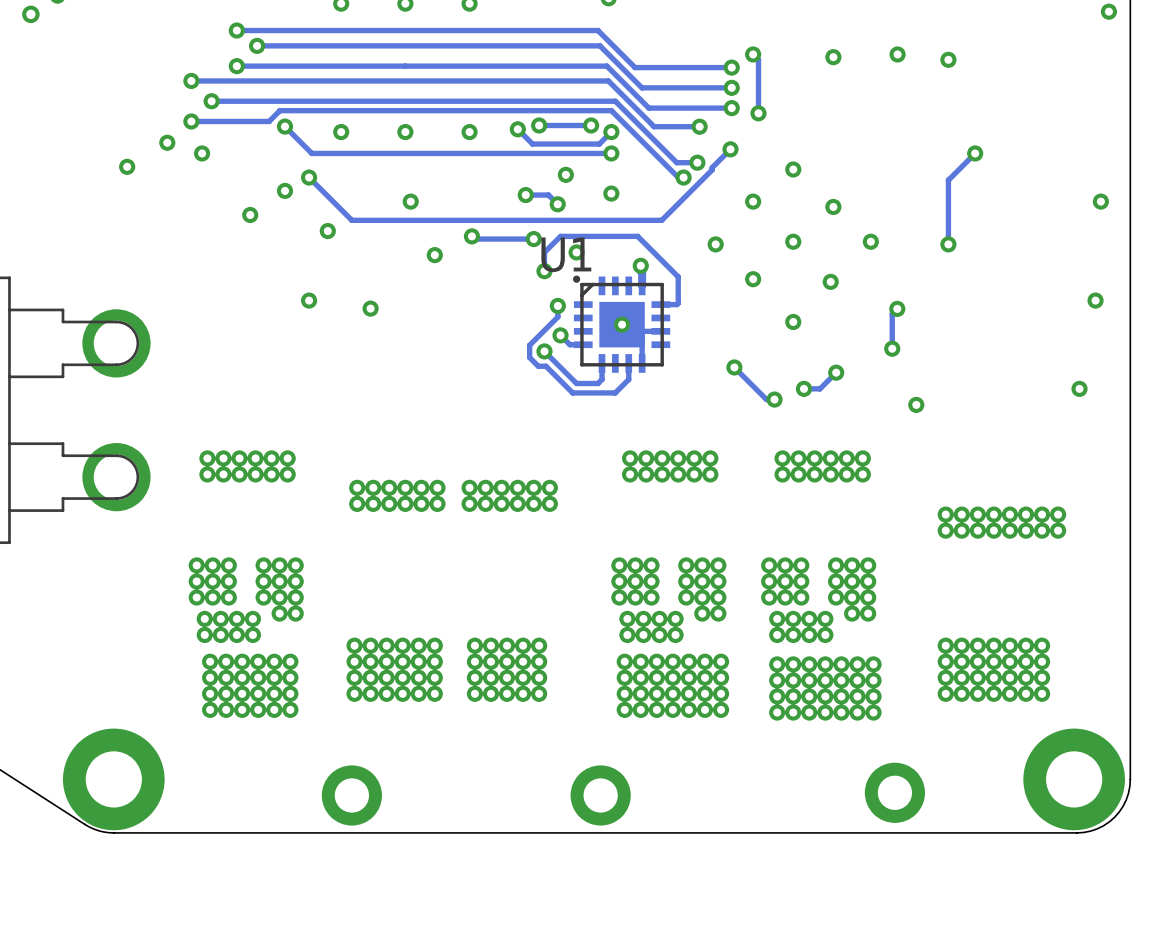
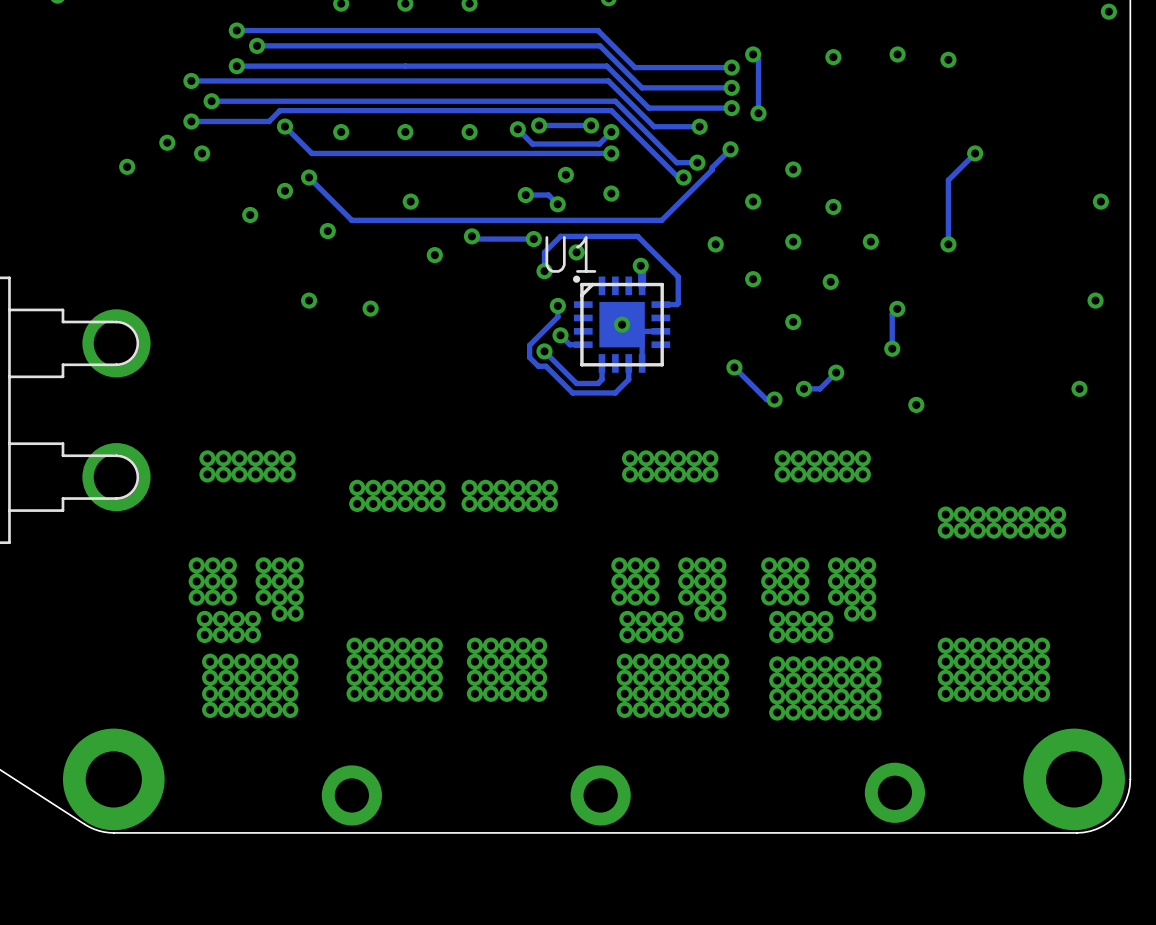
via: (30, 14) -> none

